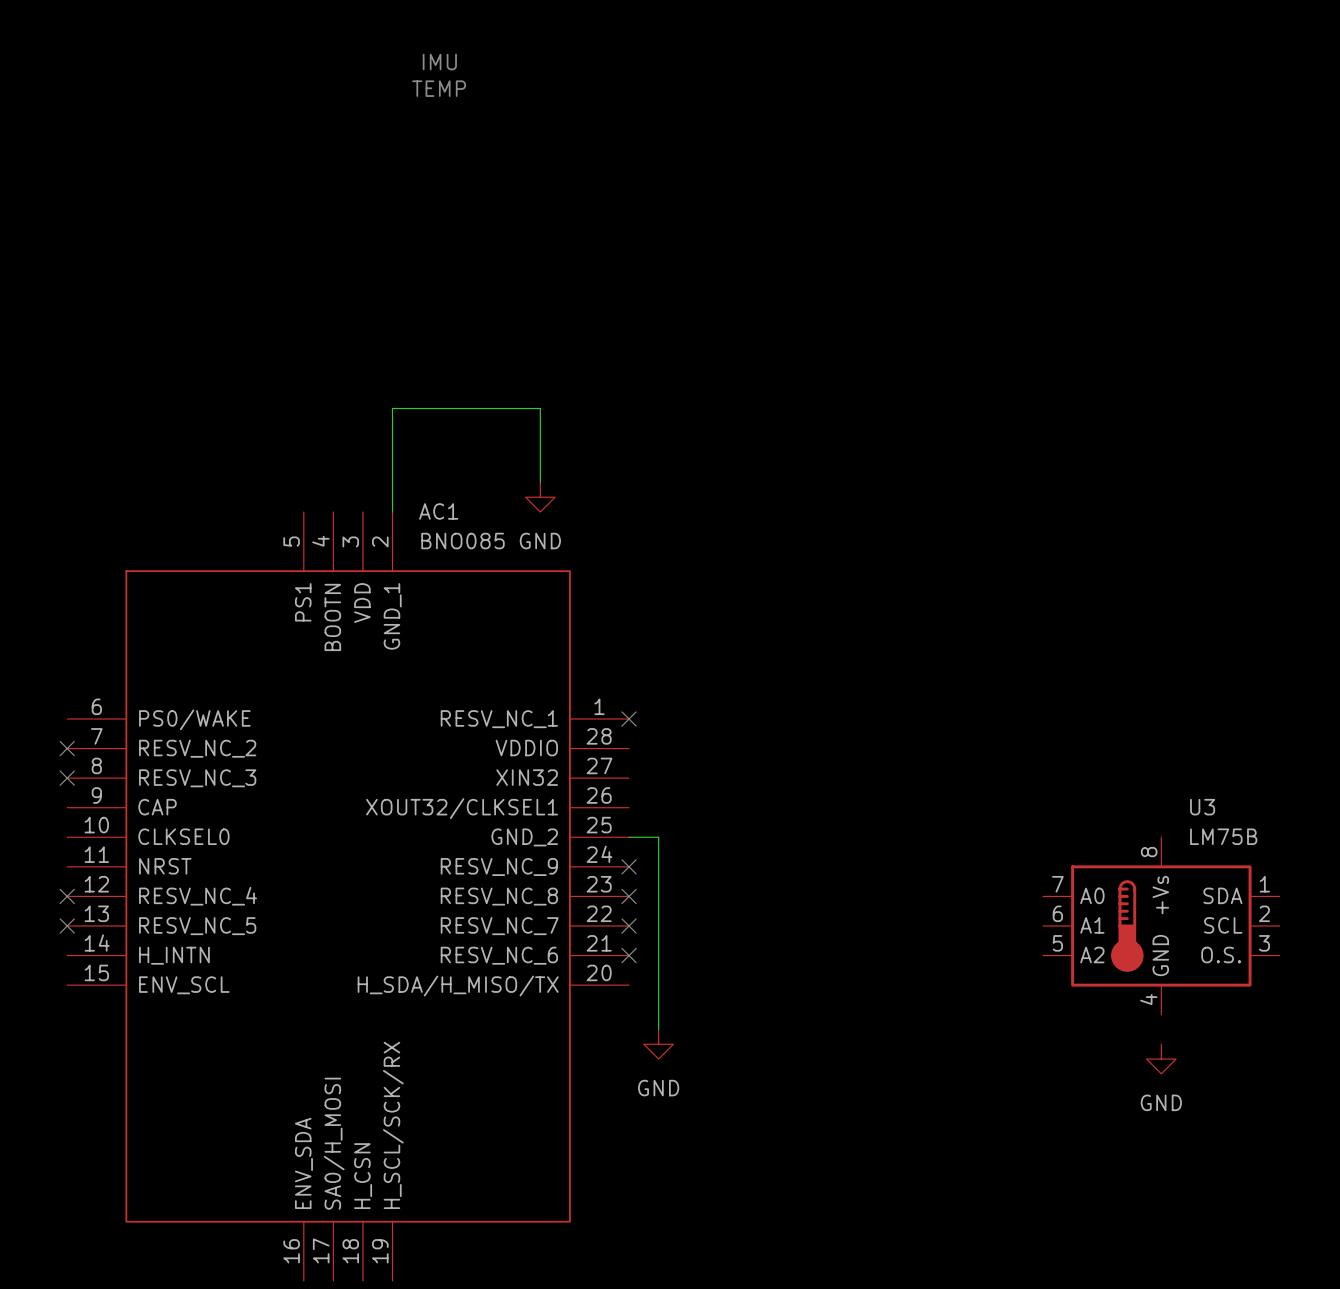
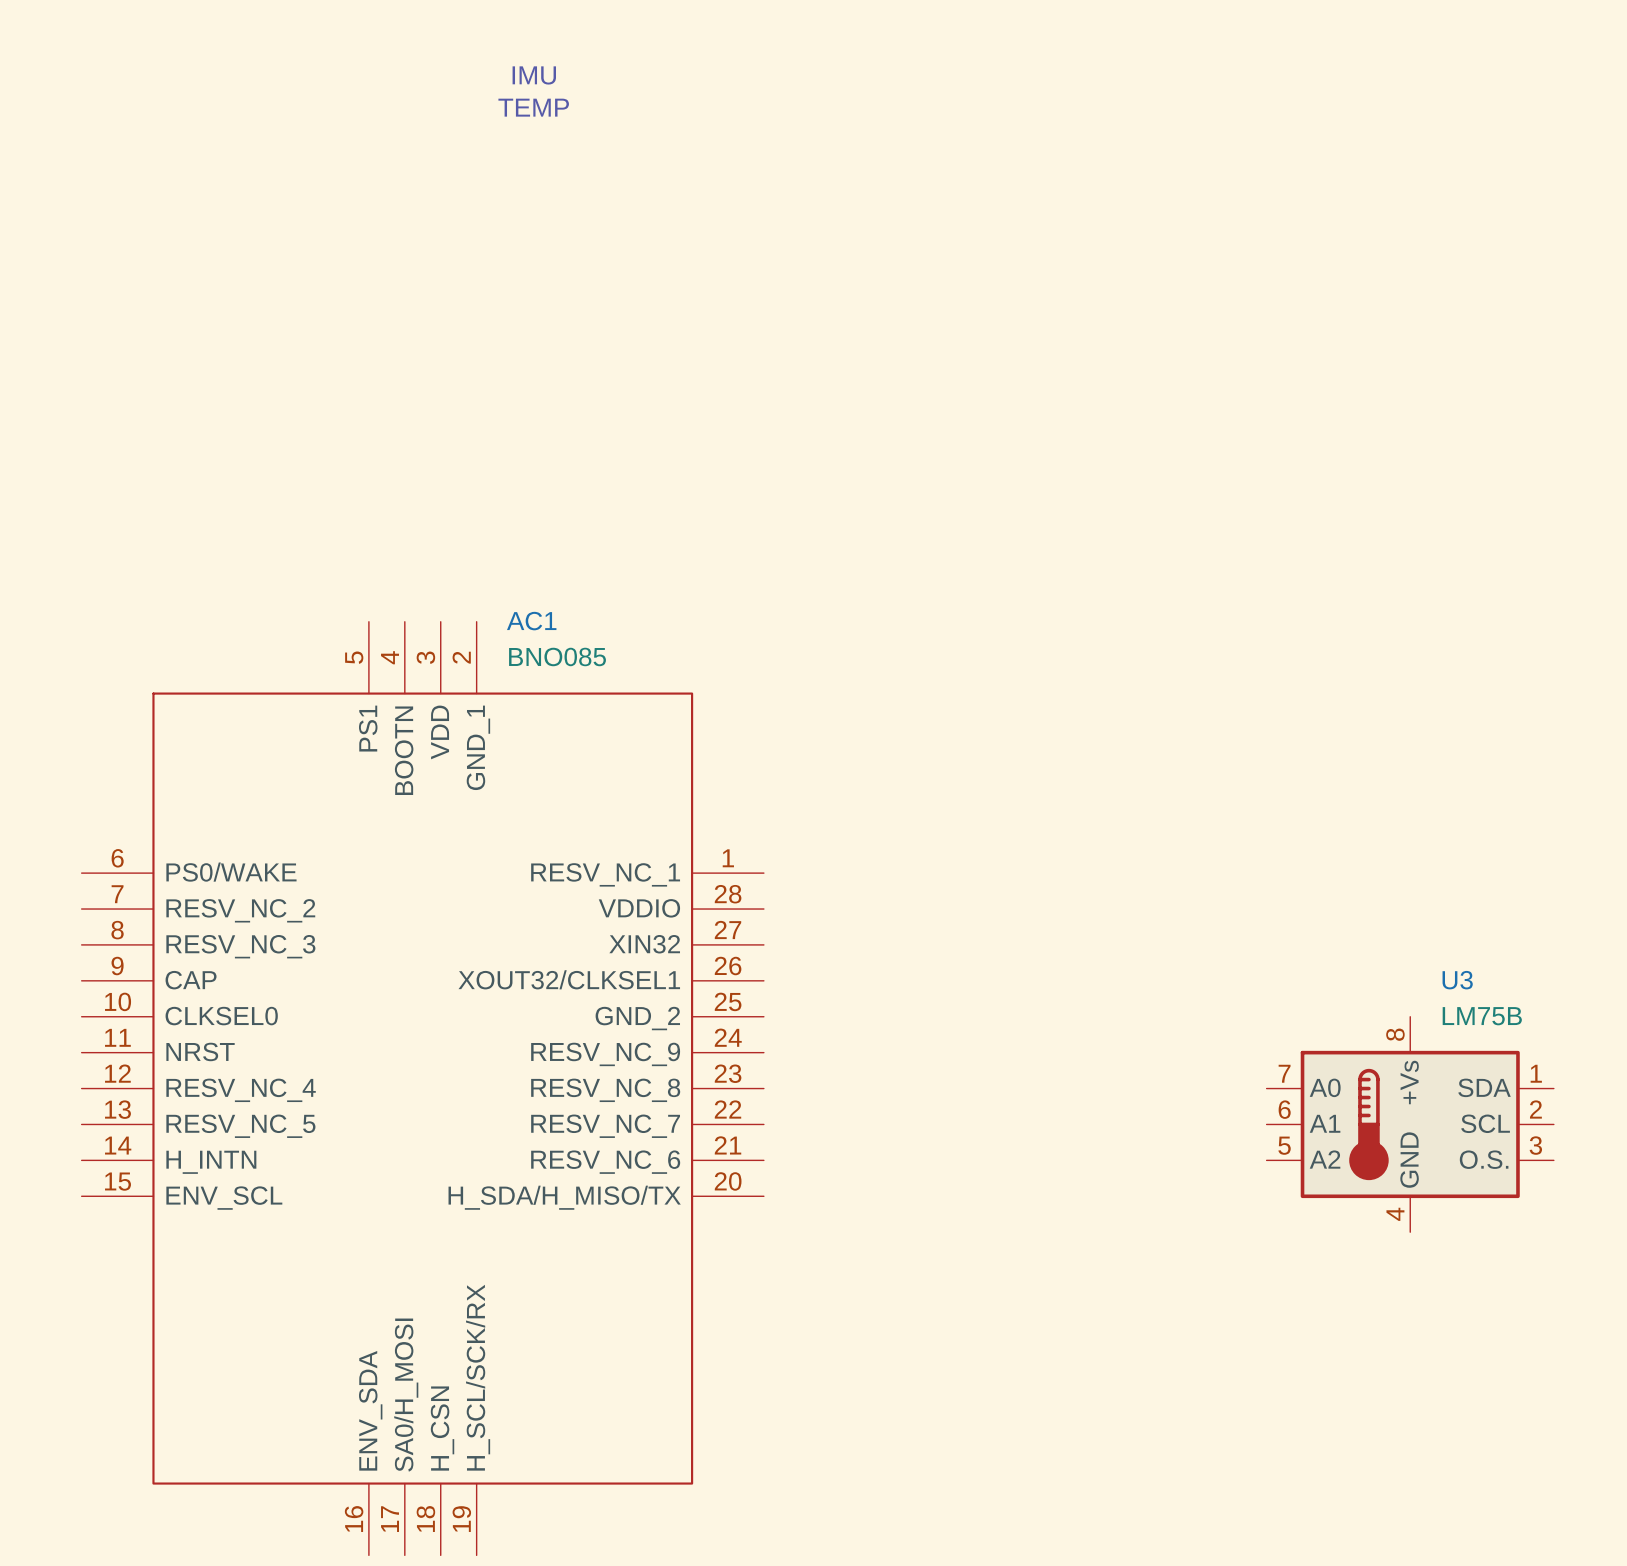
wire: (540, 482) (540, 408) (392, 408) (392, 512) -> none
power symbol: GND (540, 497) -> none
no-connect mark: (629, 719) -> none
no-connect mark: (67, 748) -> none
no-connect mark: (67, 778) -> none
wire: (629, 837) (658, 837) (658, 1029) -> none
no-connect mark: (629, 866) -> none
no-connect mark: (67, 896) -> none
no-connect mark: (629, 896) -> none
no-connect mark: (67, 925) -> none
no-connect mark: (629, 925) -> none
no-connect mark: (629, 955) -> none
power symbol: GND (658, 1044) -> none
power symbol: GND (1161, 1059) -> none

